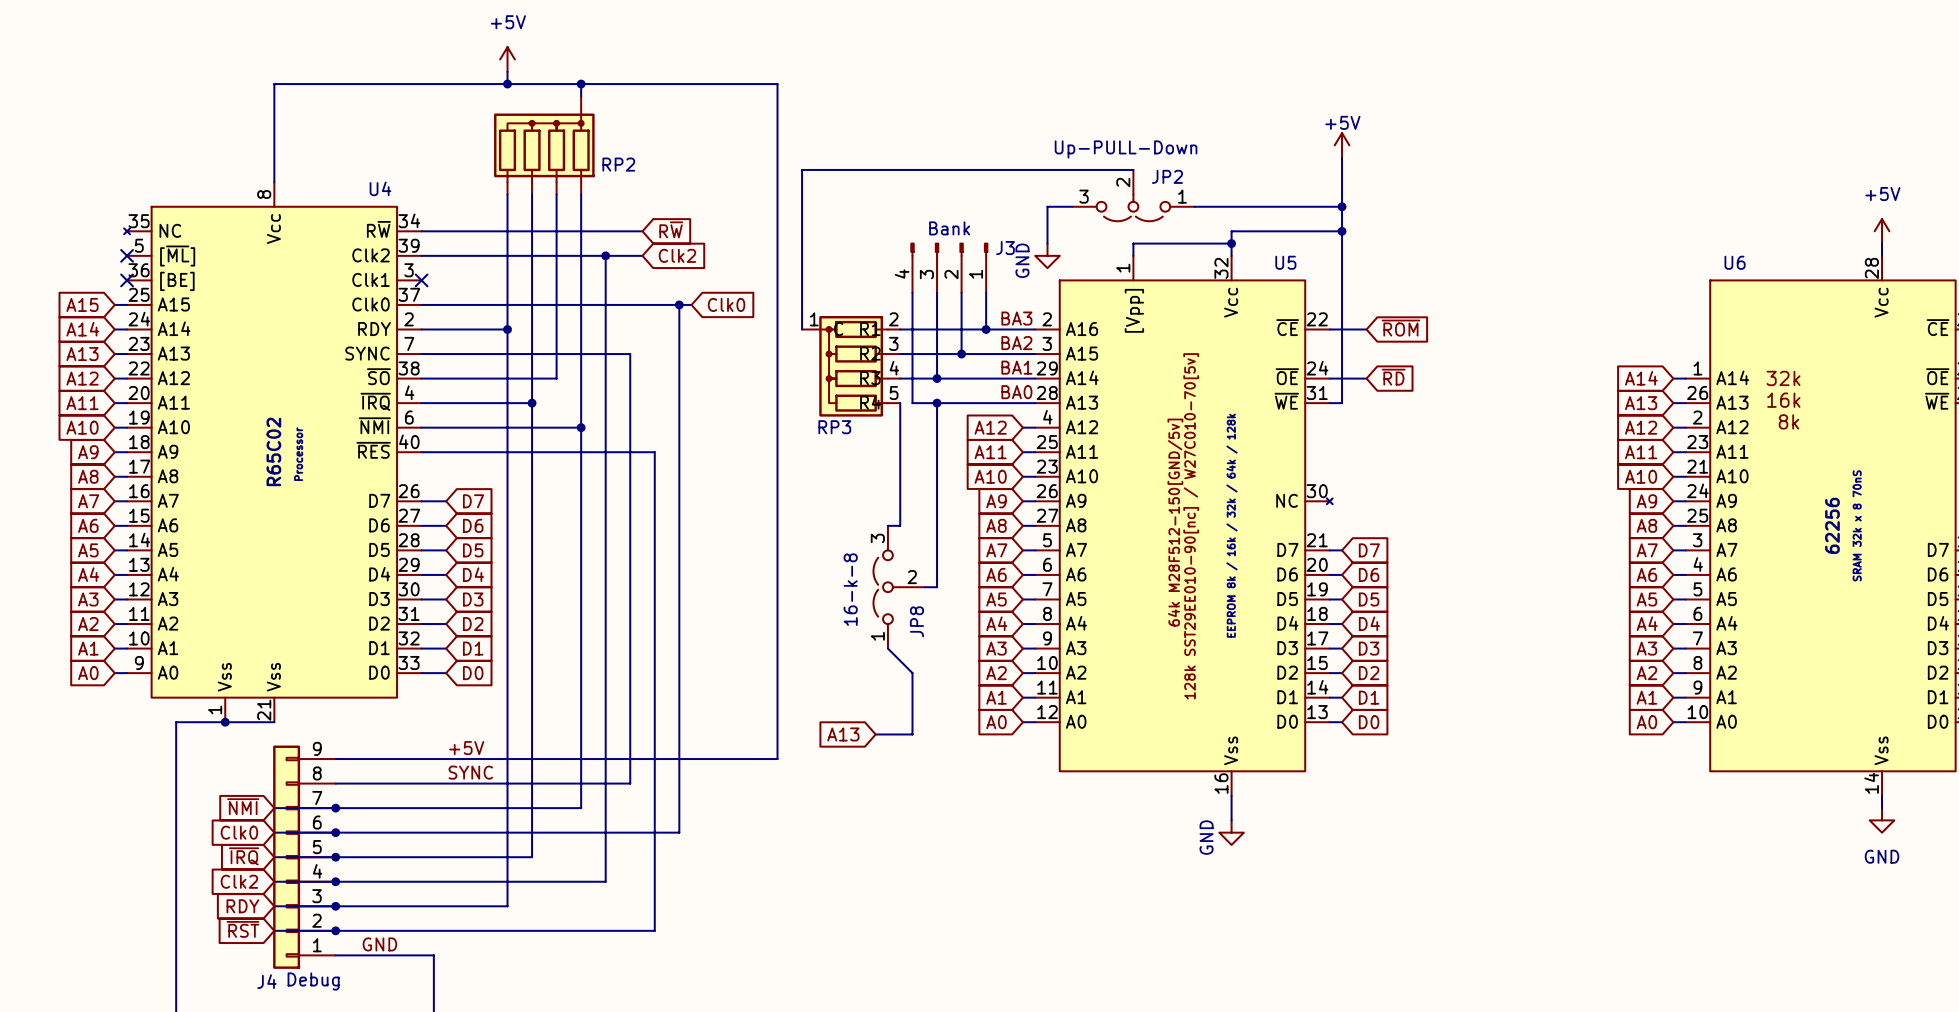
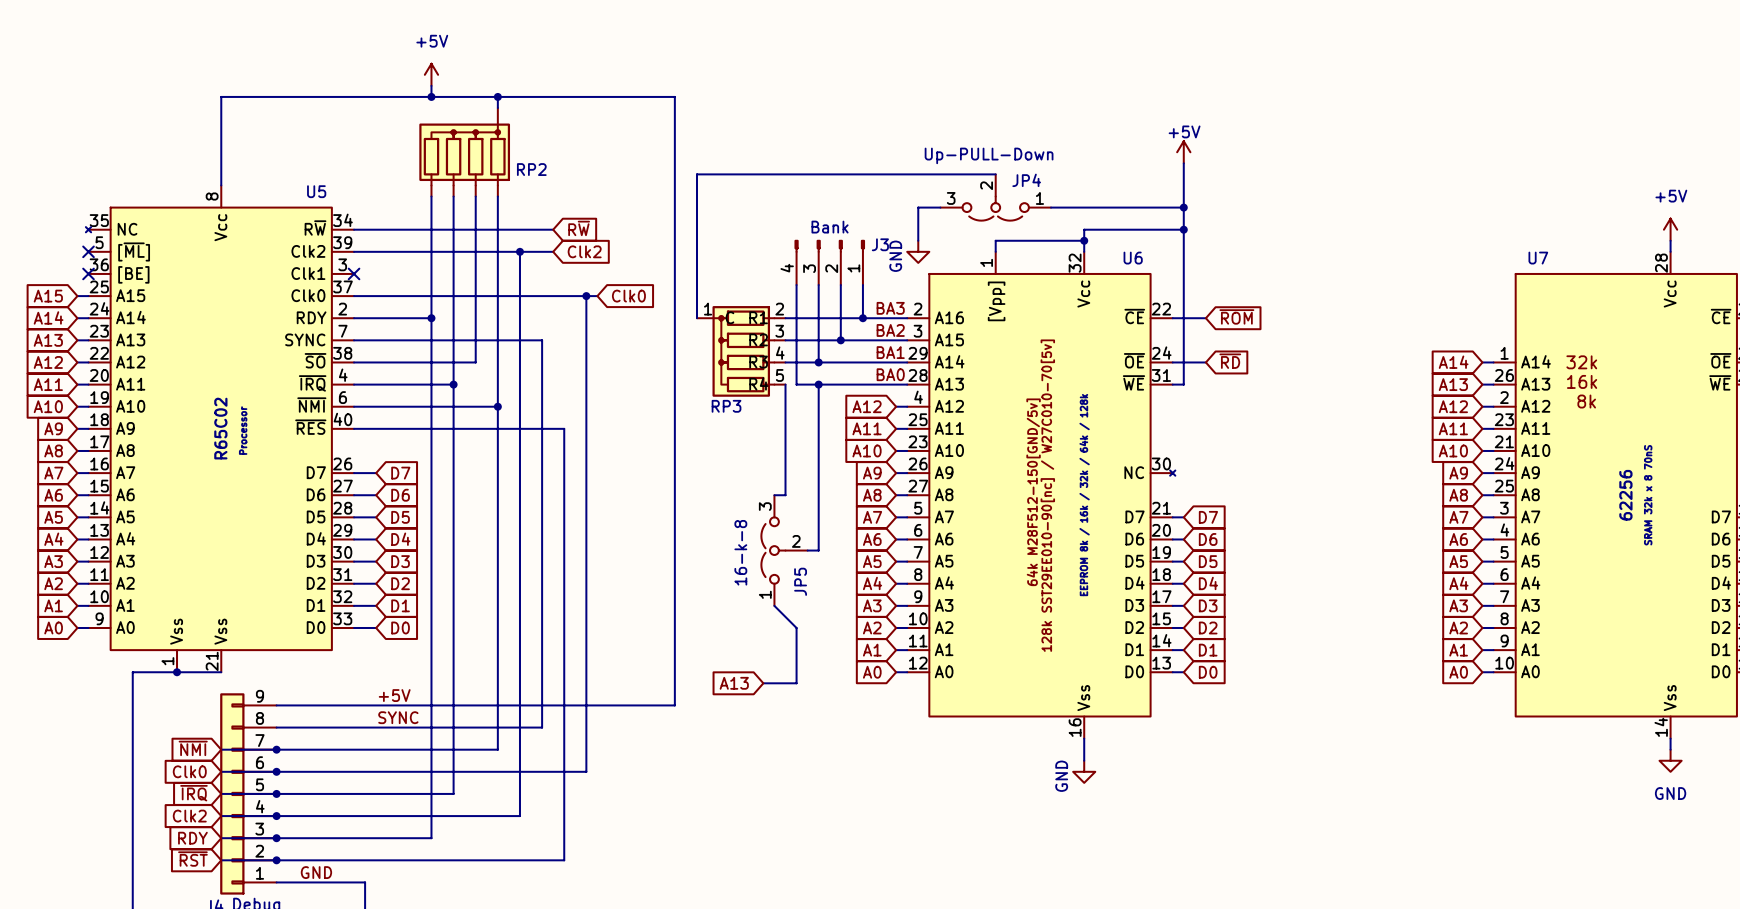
JP2 name: JP2 (1167, 176) -> JP4 (1026, 180)
U4 name: U4 (380, 188) -> U5 (316, 191)
U5 name: U5 (1285, 262) -> U6 (1133, 258)
U6 name: U6 (1735, 262) -> U7 (1538, 258)
JP8 name: JP8 (916, 621) -> JP5 (800, 581)

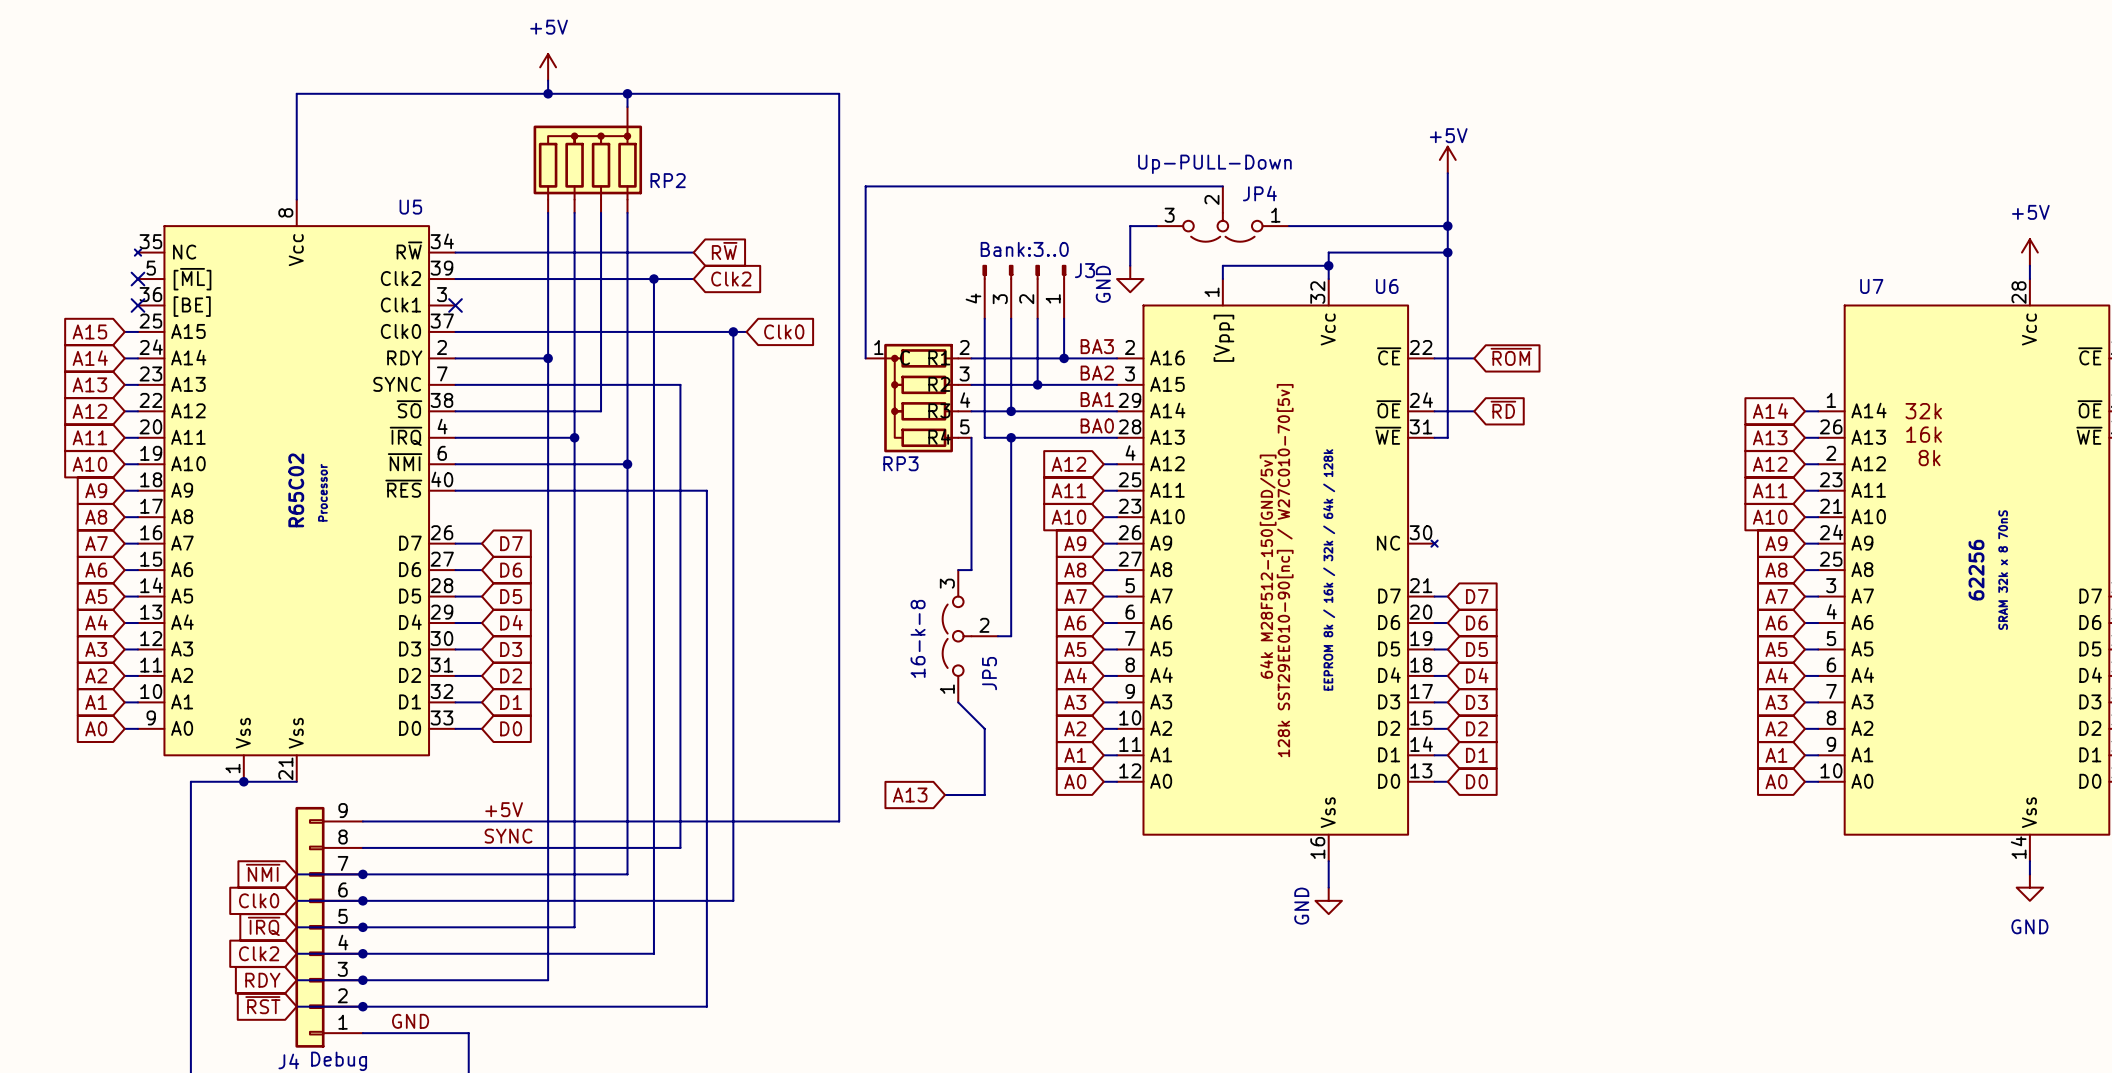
J3 value: Bank (830, 227) -> Bank:3..0 (1024, 249)

